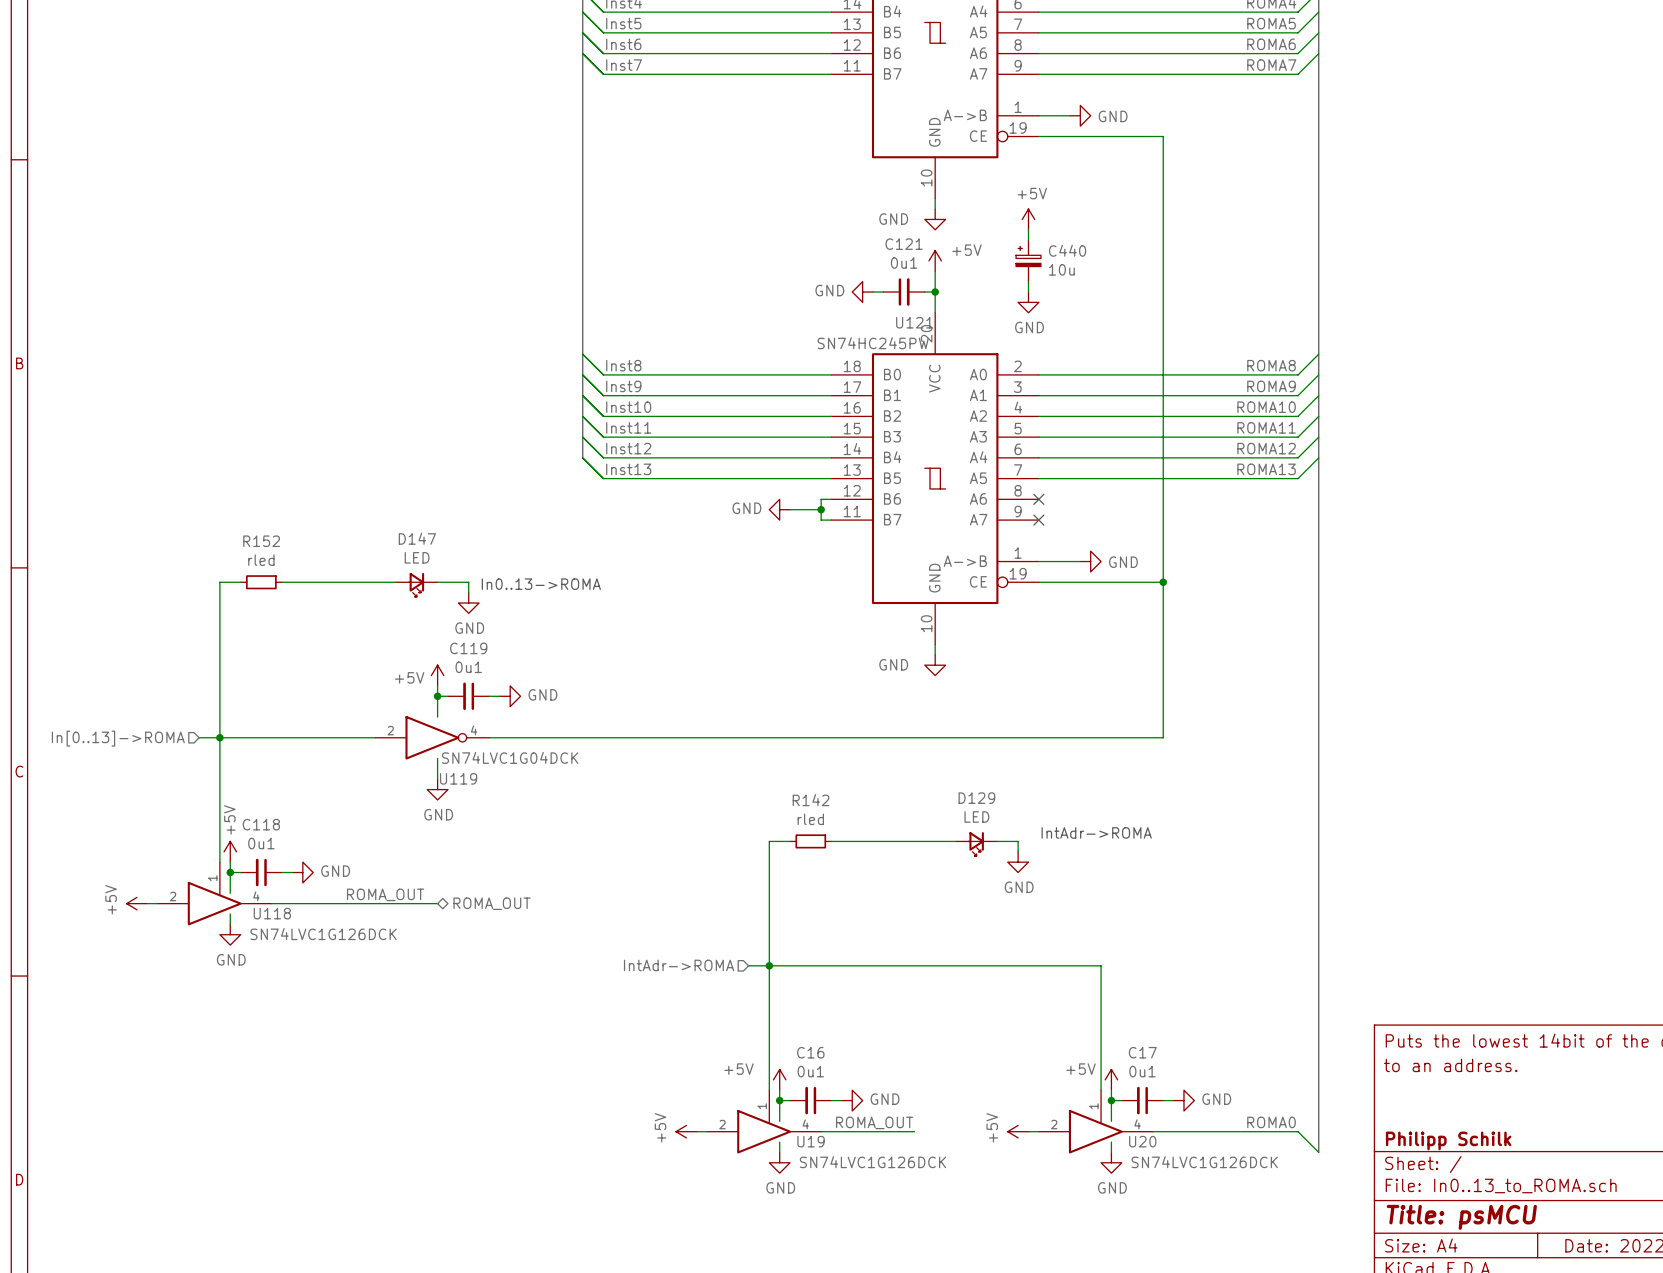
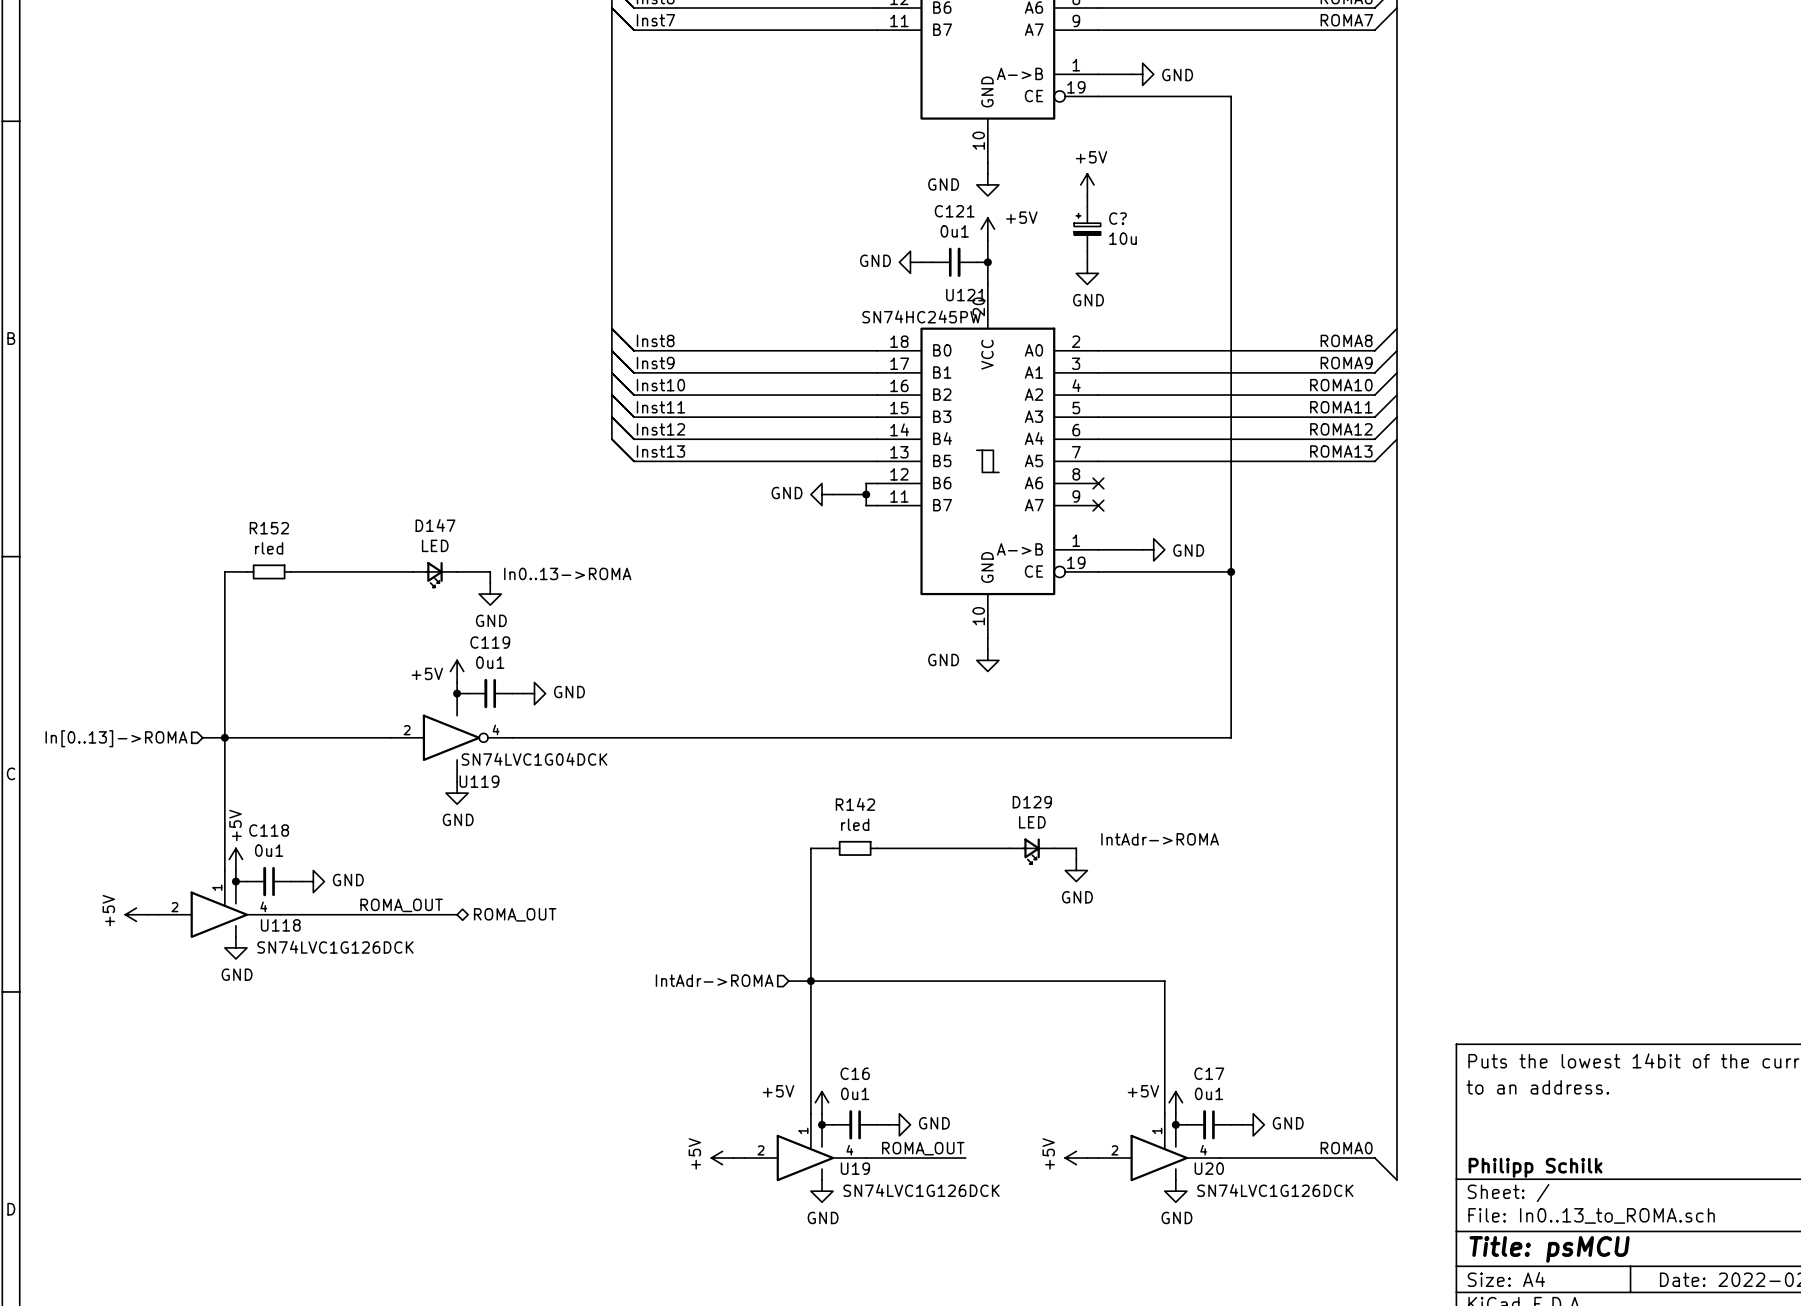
C440 name: C440 (1067, 250) -> C? (1117, 218)

